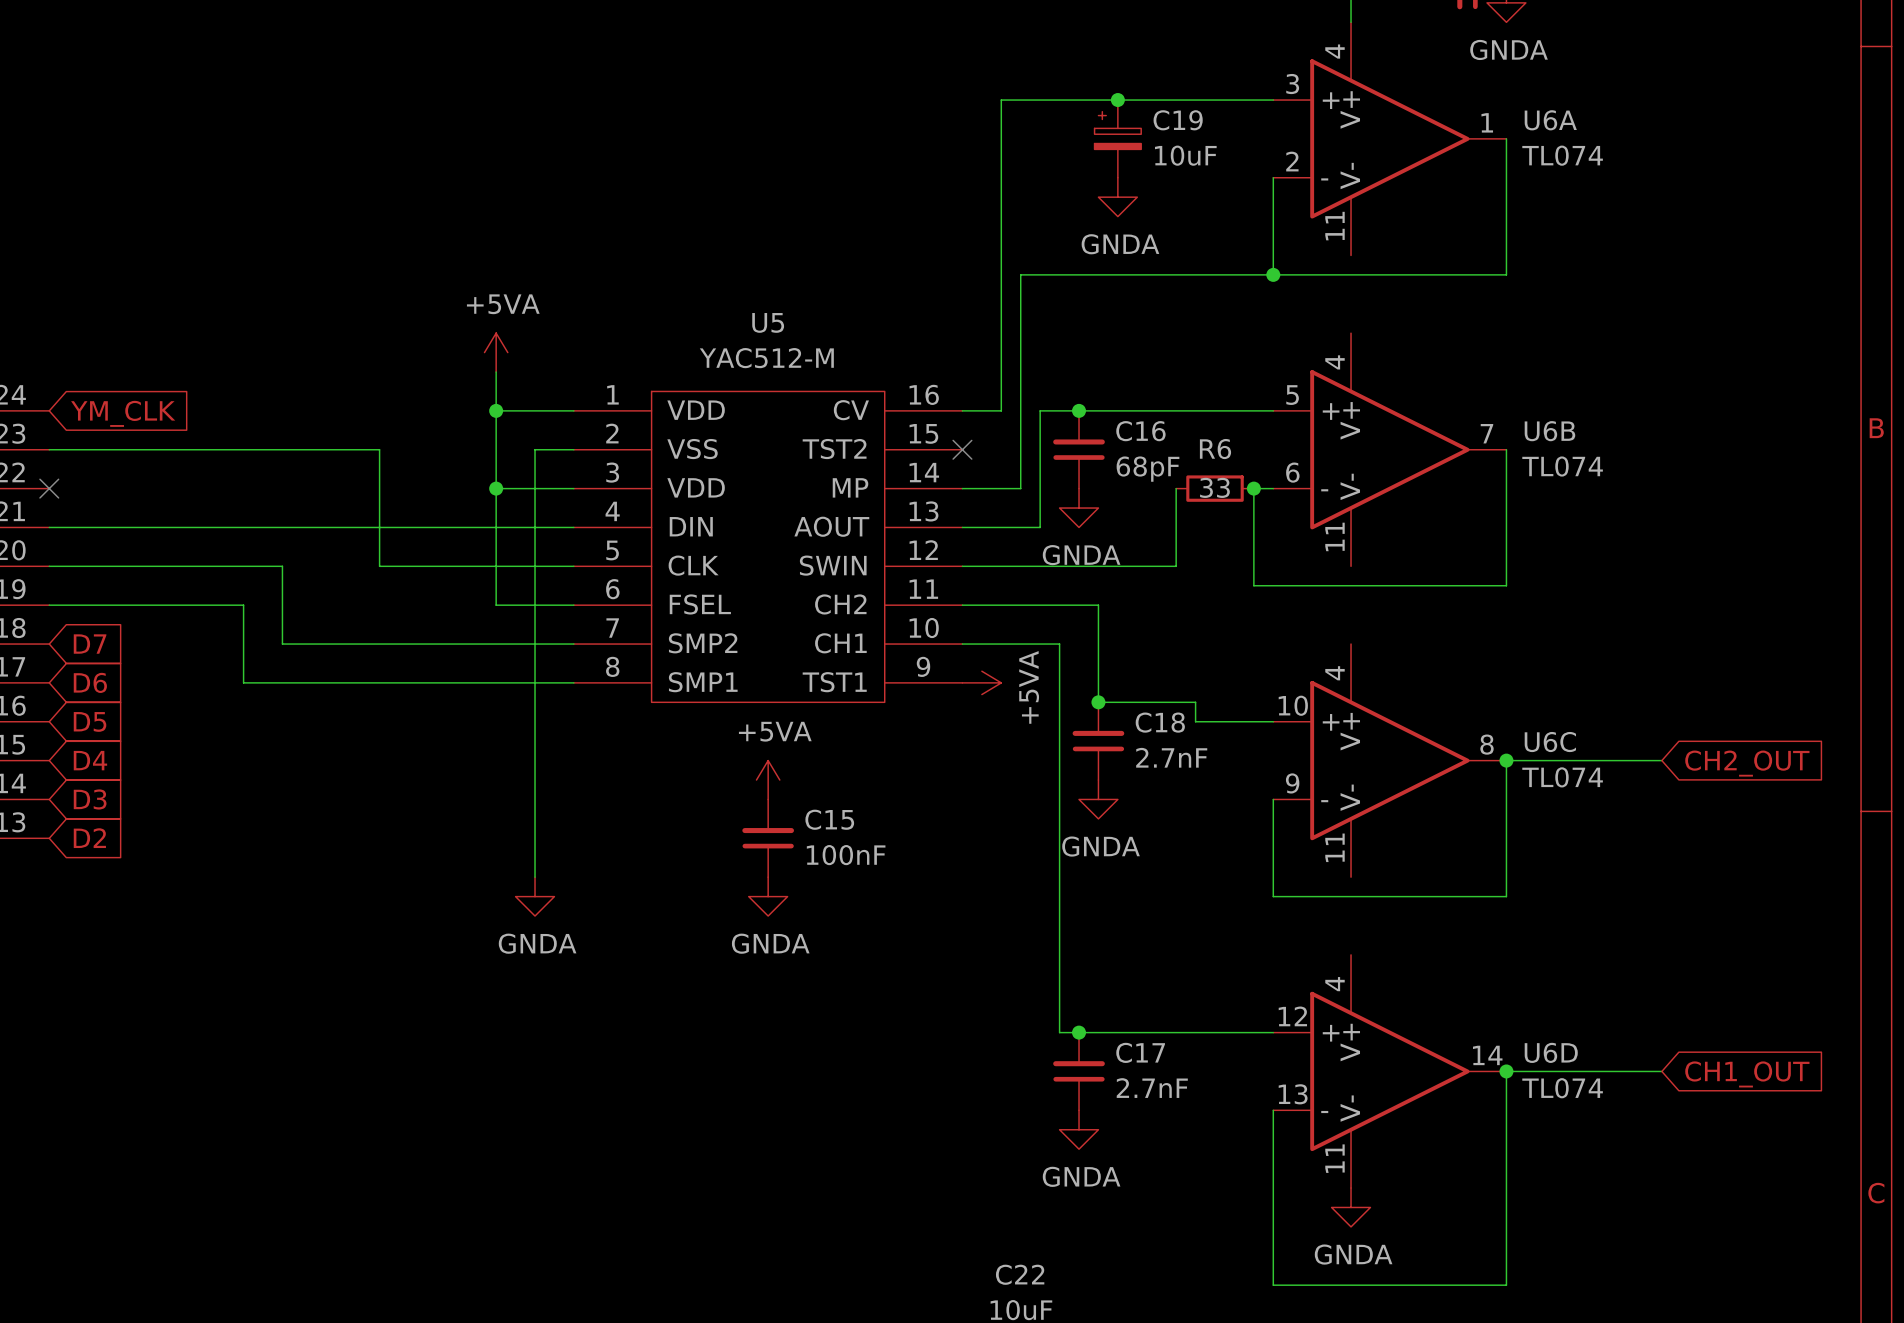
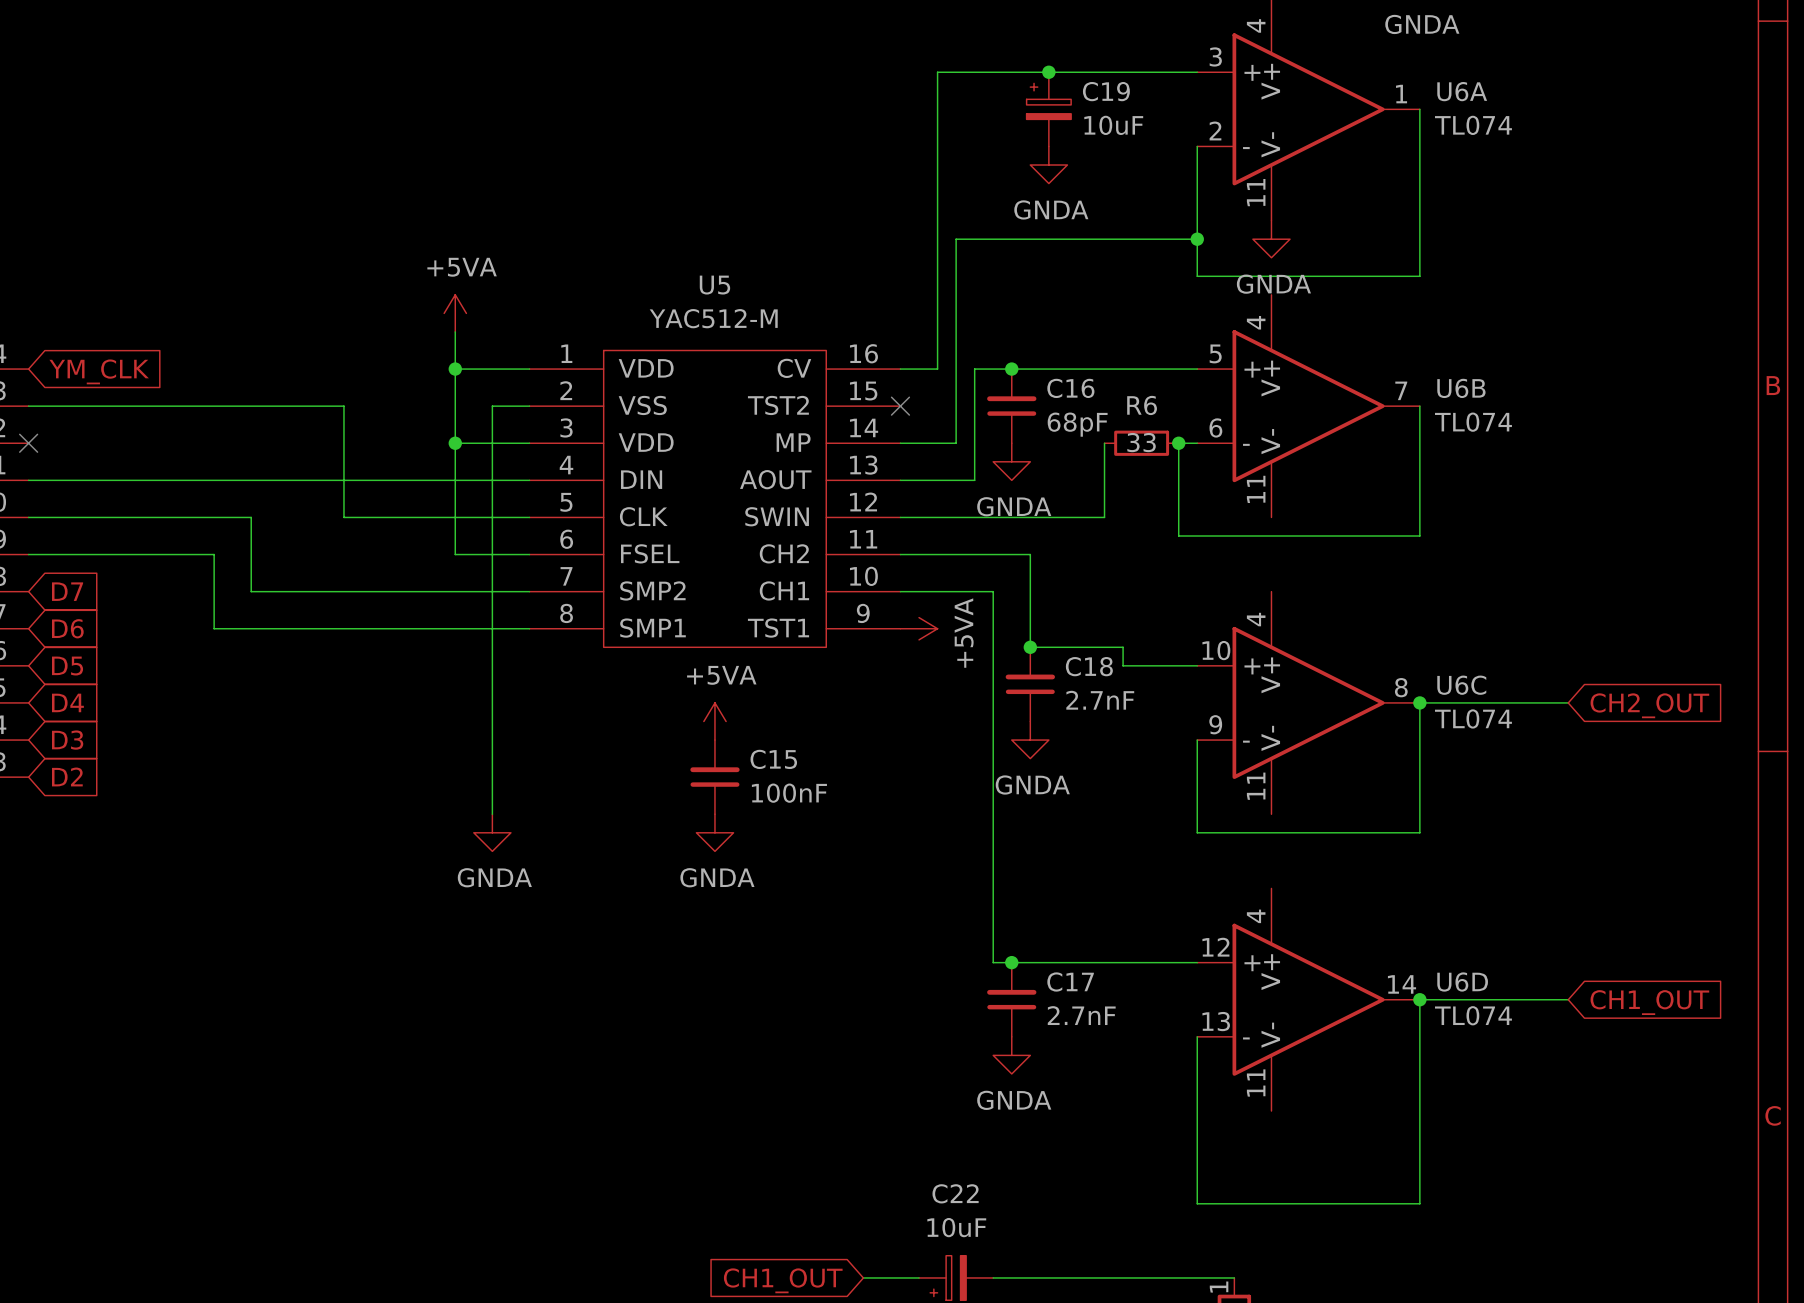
wire: (1273, 274) (1506, 274) -> (1197, 239) (1197, 276) (1419, 276) (1419, 239)
power symbol: none -> GNDA (1271, 239)
power symbol: GNDA (1351, 1207) -> none

